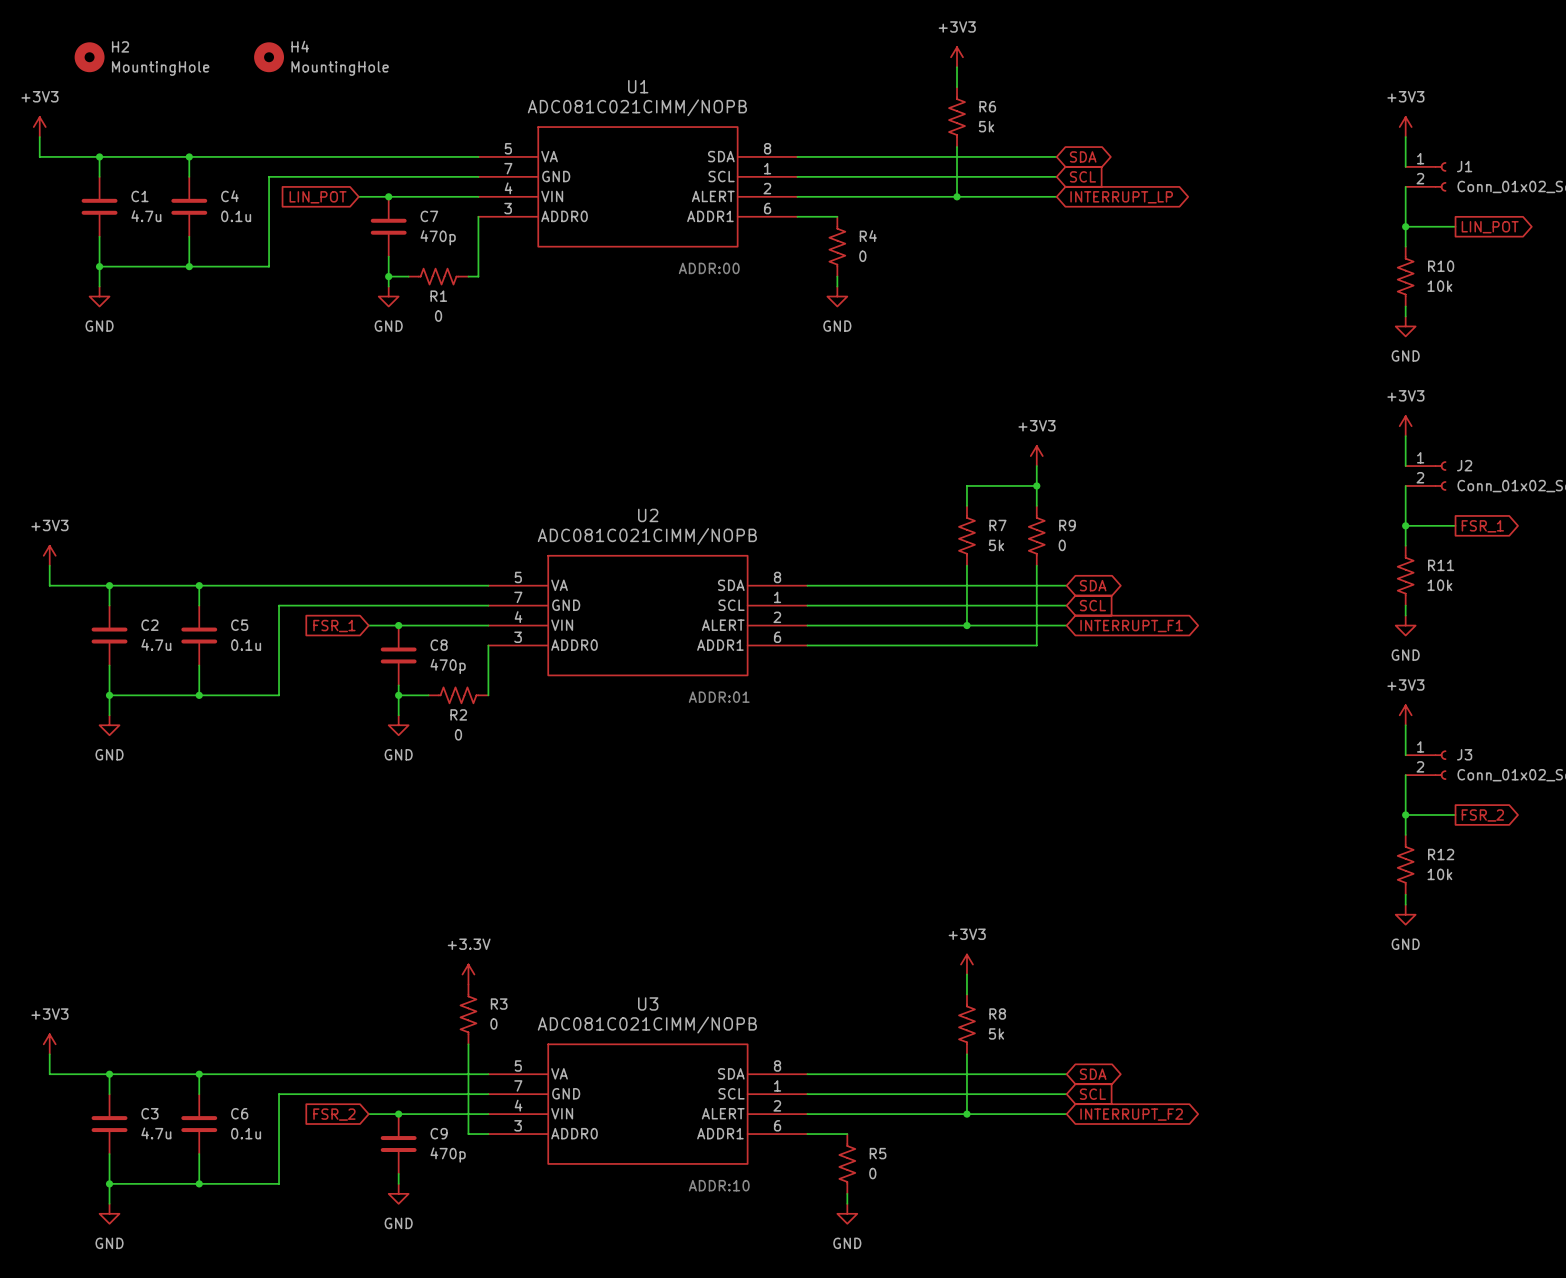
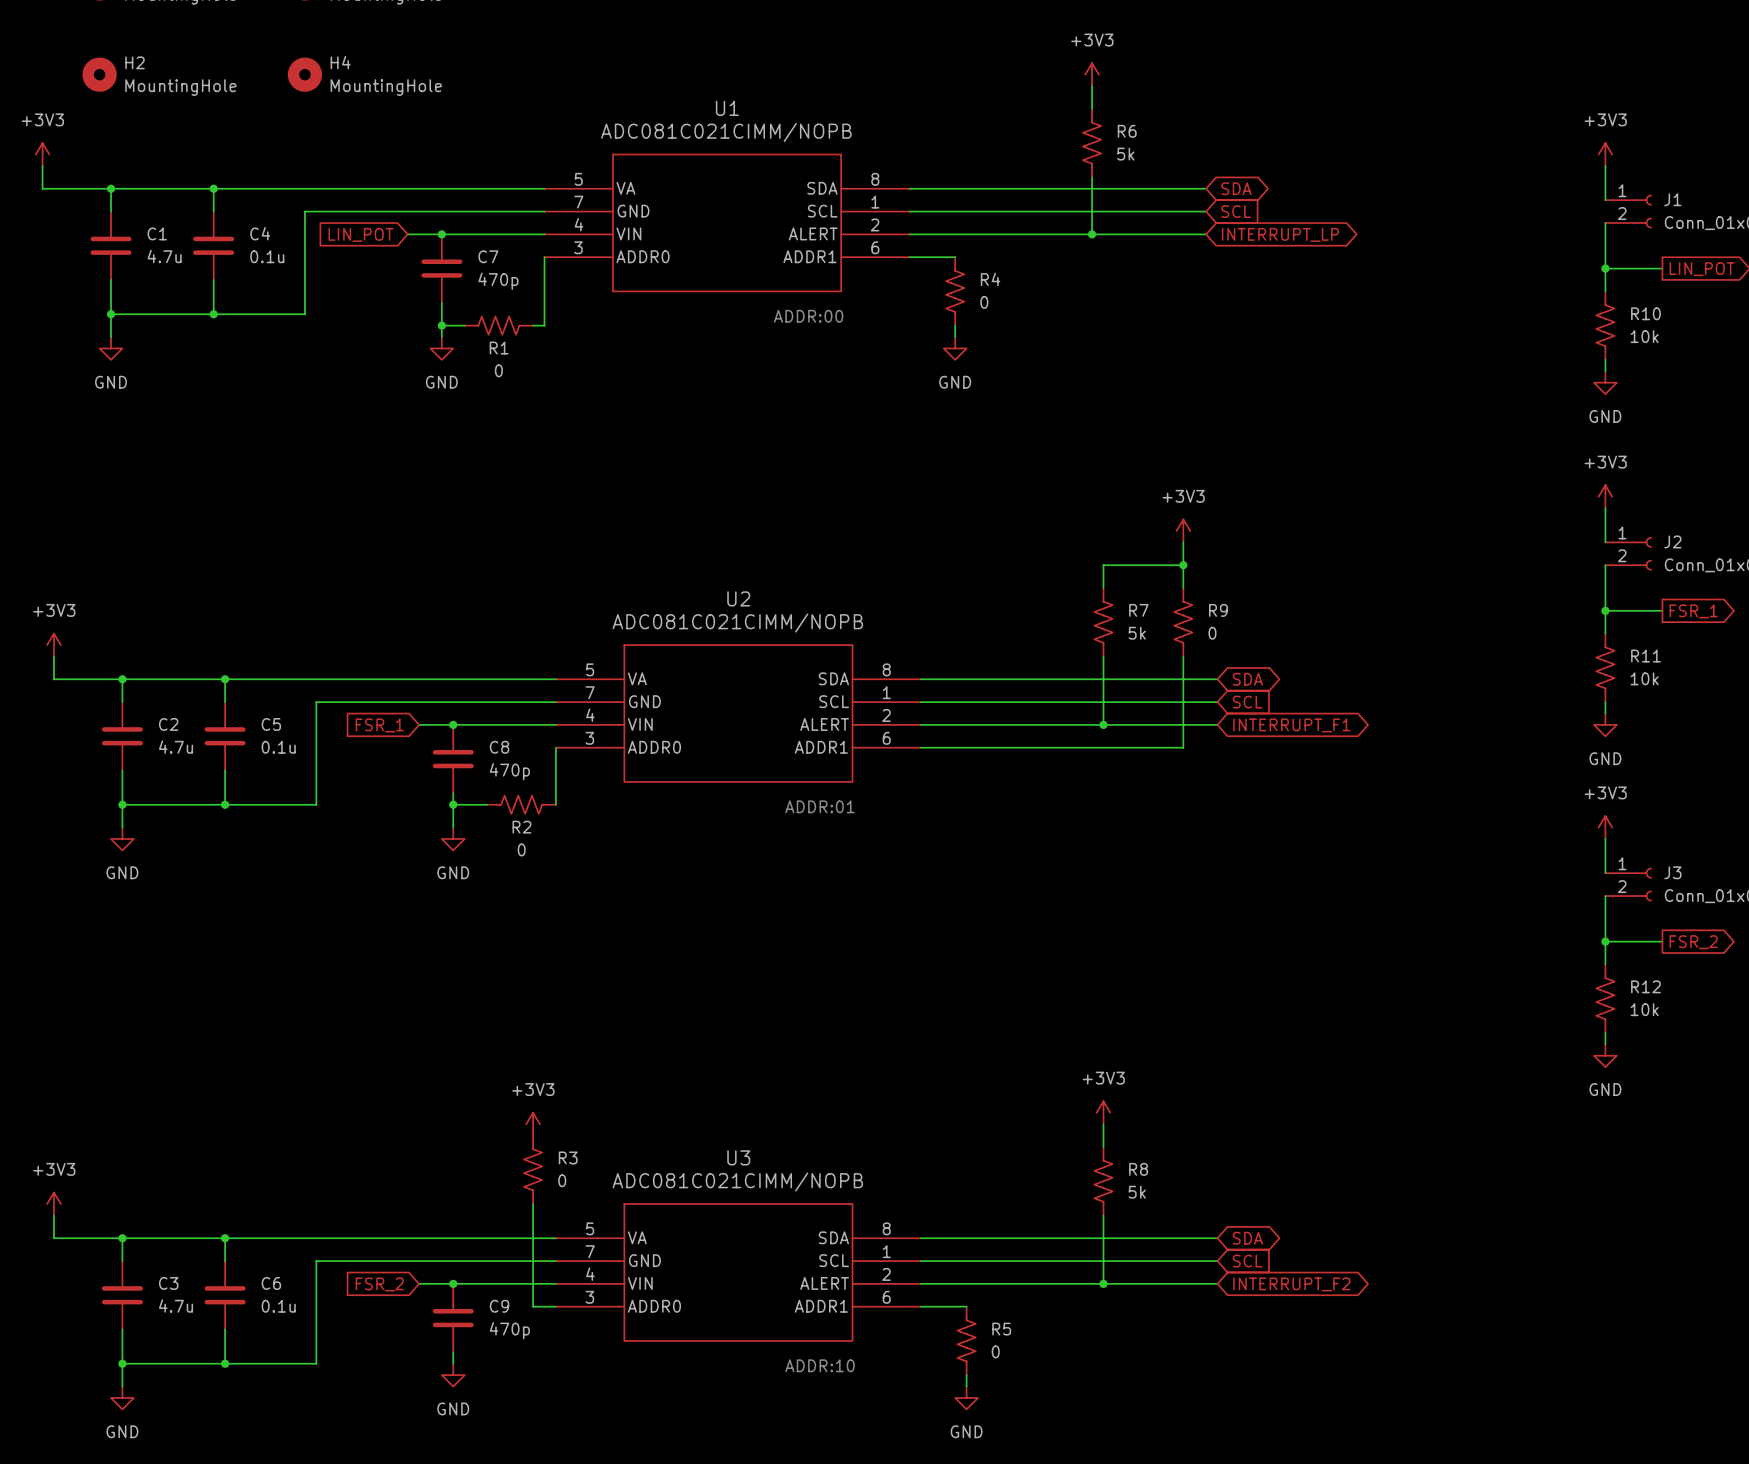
power symbol: +3.3V (468, 974) -> +3V3 (533, 1124)

